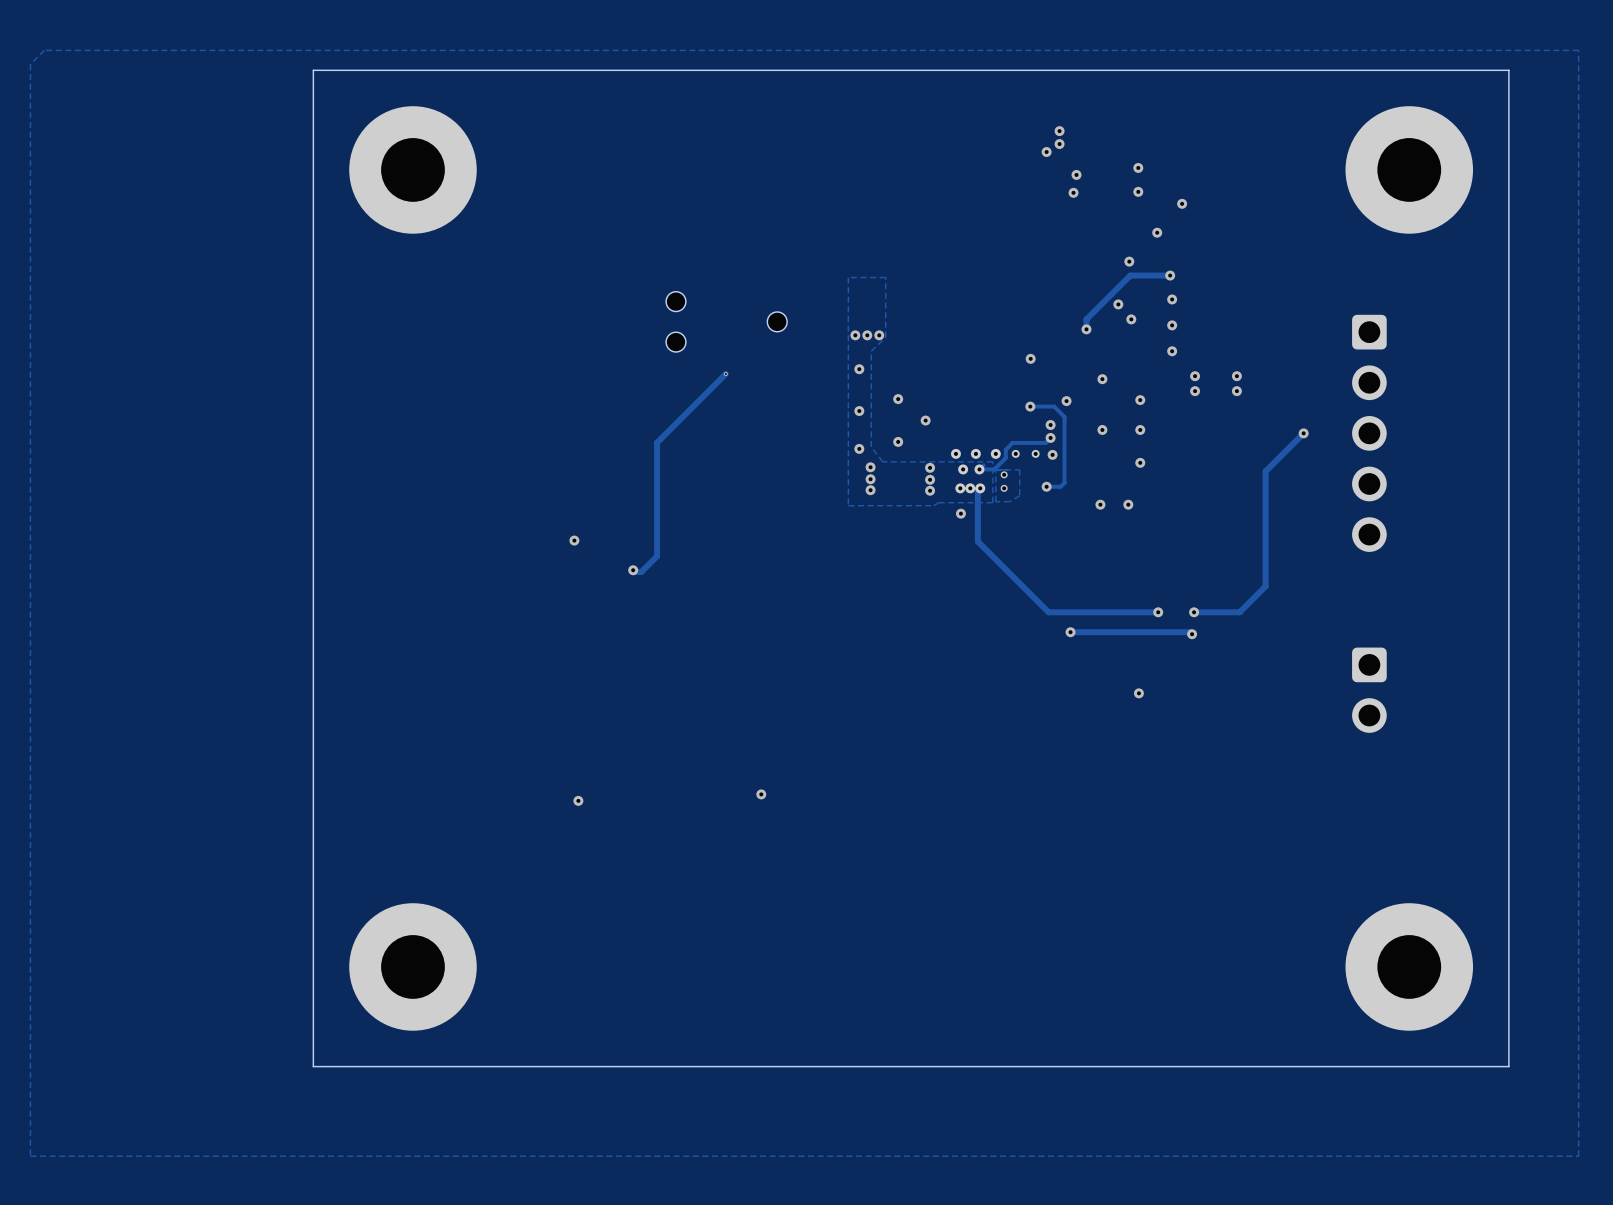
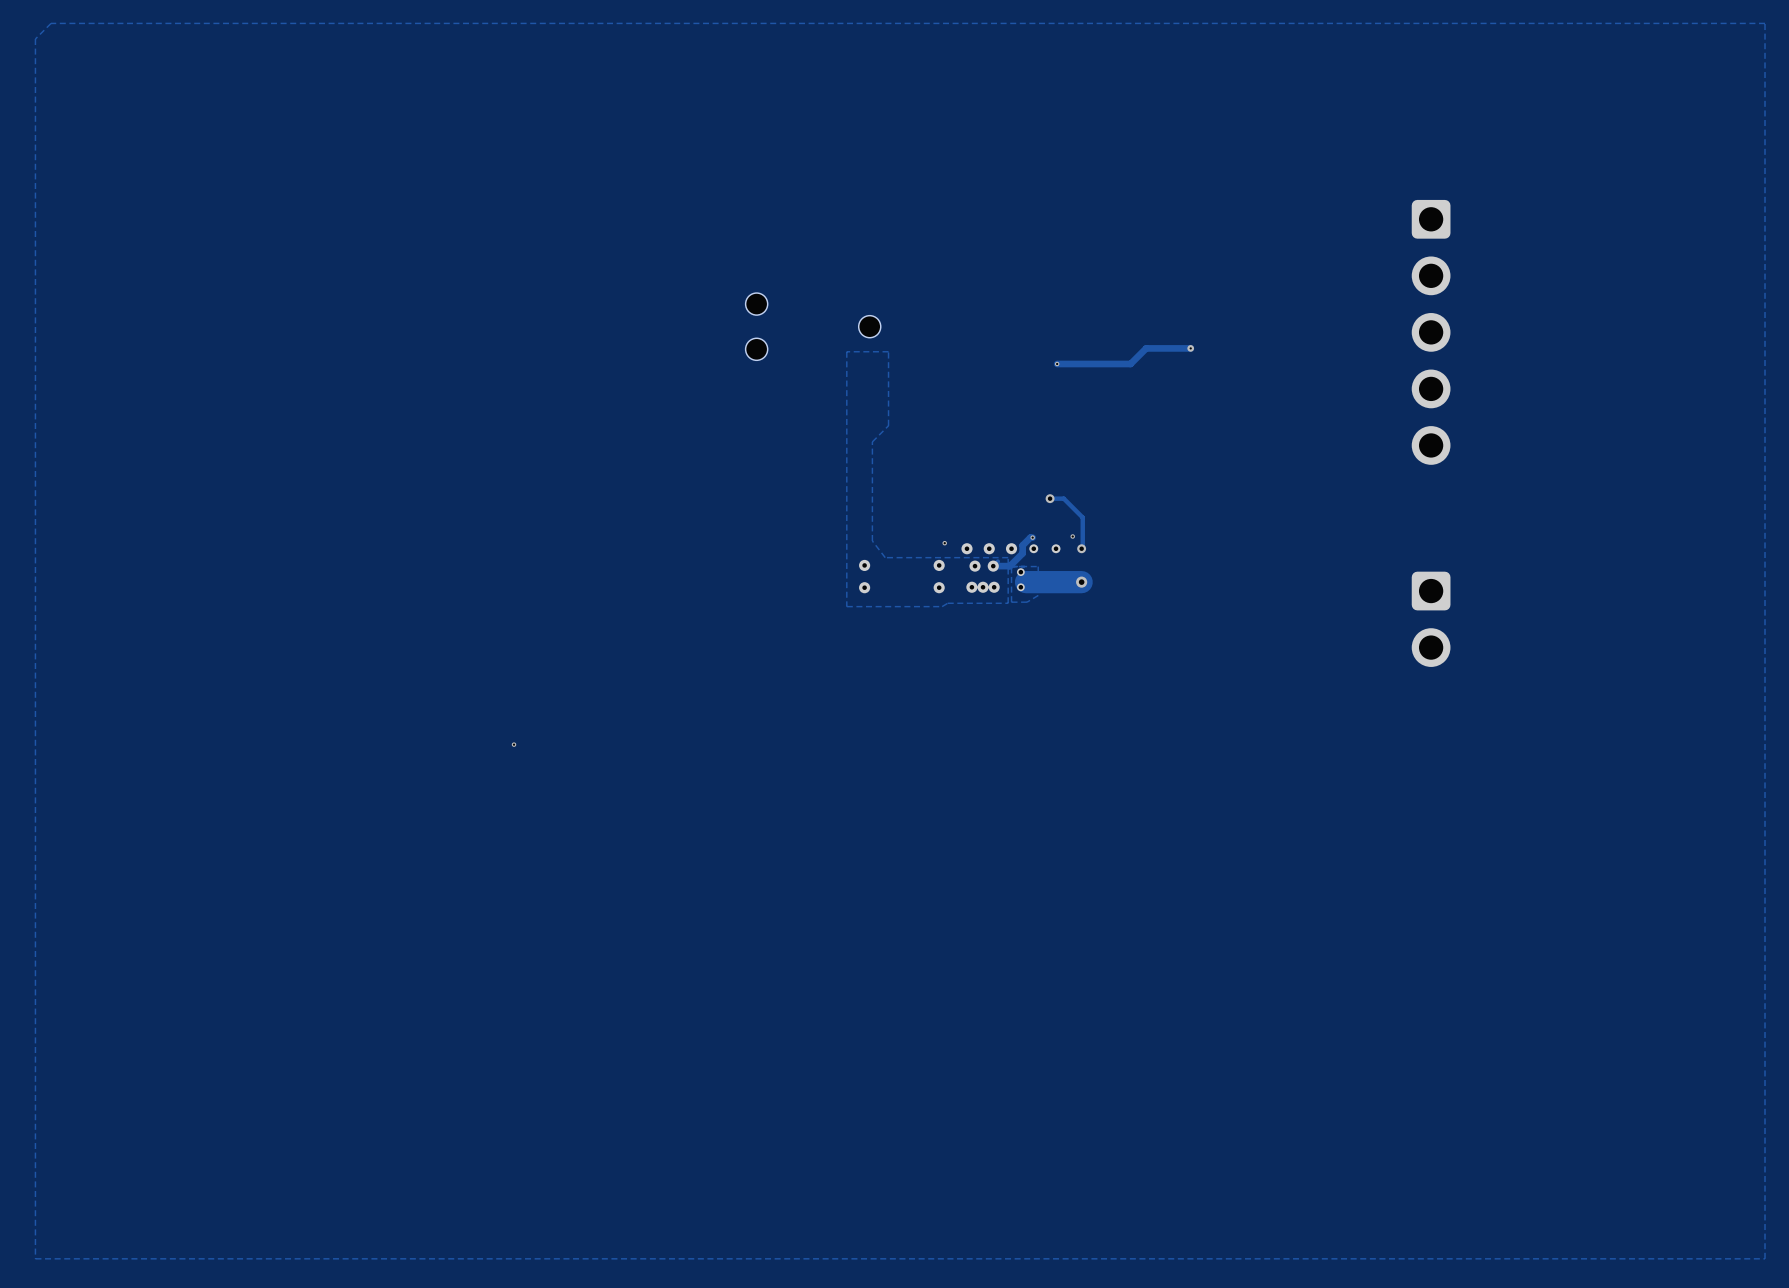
board edge: (1508, 70) (313, 70) (313, 1066) (1508, 1066) (1508, 70) -> none
via: (1059, 131) -> none
via: (1059, 144) -> none
via: (1046, 152) -> none
via: (1138, 167) -> none
part: (412, 169) -> none
part: (1409, 169) -> none
via: (1076, 174) -> none
via: (1138, 191) -> none
via: (1073, 192) -> none
via: (1182, 203) -> none
via: (1157, 232) -> none
via: (1129, 261) -> none
track: (1170, 275) (1130, 275) (1086, 319) (1086, 329) -> none
via: (1170, 275) -> none
zone outline: (885, 277) (885, 337) (871, 351) (871, 446) (882, 461) (992, 461) (992, 502) (938, 502) (933, 505) (848, 505) (848, 277) (885, 277) -> none
via: (1172, 299) -> none
via: (1118, 304) -> none
via: (1131, 319) -> none
via: (1172, 325) -> none
via: (1086, 329) -> none
via: (855, 335) -> none
via: (867, 335) -> none
via: (879, 335) -> none
track: none -> (1190, 348) (1146, 348) (1130, 363) (1057, 363)
via: none -> (1190, 348)
zone outline: none -> (888, 351) (888, 425) (872, 441) (872, 541) (885, 557) (1008, 557) (1008, 603) (947, 603) (942, 606) (846, 606) (846, 351) (888, 351)
via: (1172, 351) -> none
via: none -> (1057, 363)
via: (1030, 358) -> none
via: (859, 369) -> none
track: (725, 373) (657, 442) (657, 556) (641, 571) (633, 570) -> none
via: (725, 373) -> none
via: (1195, 376) -> none
via: (1236, 376) -> none
via: (1102, 379) -> none
via: (1195, 391) -> none
via: (1236, 391) -> none
via: (898, 399) -> none
via: (1140, 400) -> none
via: (1066, 401) -> none
track: (1030, 406) (1054, 406) (1064, 417) (1064, 482) (1060, 486) (1046, 486) -> none
via: (1030, 406) -> none
via: (859, 411) -> none
via: (925, 420) -> none
via: (1050, 425) -> none
via: (1102, 429) -> none
via: (1140, 429) -> none
track: (1303, 433) (1265, 471) (1265, 586) (1239, 612) (1194, 612) -> none
via: (1303, 433) -> none
part position: (1369, 433) -> (1431, 332)
track: (1050, 437) (1045, 442) (1012, 442) (1005, 449) (1005, 458) (994, 469) (979, 469) (983, 465) -> none
via: (1050, 437) -> none
via: (898, 441) -> none
via: (859, 448) -> none
via: (1052, 454) -> none
via: (1140, 462) -> none
via: (870, 467) -> none
via: (930, 467) -> none
zone outline: (1019, 469) (1019, 495) (1009, 501) (995, 501) (995, 469) (1019, 469) -> (1038, 566) (1038, 595) (1027, 602) (1011, 602) (1011, 566) (1038, 566)
part position: (995, 471) -> (1010, 568)
track: none -> (1051, 497) (1050, 498) (1063, 498) (1082, 517) (1081, 548)
via: none -> (1050, 498)
via: (870, 479) -> none
via: (930, 479) -> none
via: (1046, 486) -> none
track: (980, 488) (977, 490) (977, 541) (1048, 612) (1158, 612) -> none
via: (870, 490) -> none
via: (930, 490) -> none
via: (1100, 504) -> none
via: (1128, 504) -> none
via: none -> (1072, 536)
track: none -> (1032, 537) (1022, 545) (1022, 553) (1009, 566) (993, 566) (997, 561)
via: none -> (1032, 537)
via: (960, 513) -> none
via: none -> (944, 543)
via: none -> (1081, 548)
part: none -> (864, 565)
part: none -> (939, 565)
via: (574, 540) -> none
track: none -> (1081, 582) (1025, 582)
via: none -> (1081, 582)
part: none -> (864, 587)
part: none -> (939, 587)
via: (633, 570) -> none
via: (1158, 612) -> none
via: (1194, 612) -> none
track: (1070, 632) (1190, 632) (1192, 634) -> none
via: (1070, 632) -> none
via: (1192, 634) -> none
part position: (1369, 690) -> (1431, 619)
via: (1138, 693) -> none
via: none -> (514, 744)
via: (761, 794) -> none
via: (578, 800) -> none
part: (412, 966) -> none
part: (1409, 966) -> none

